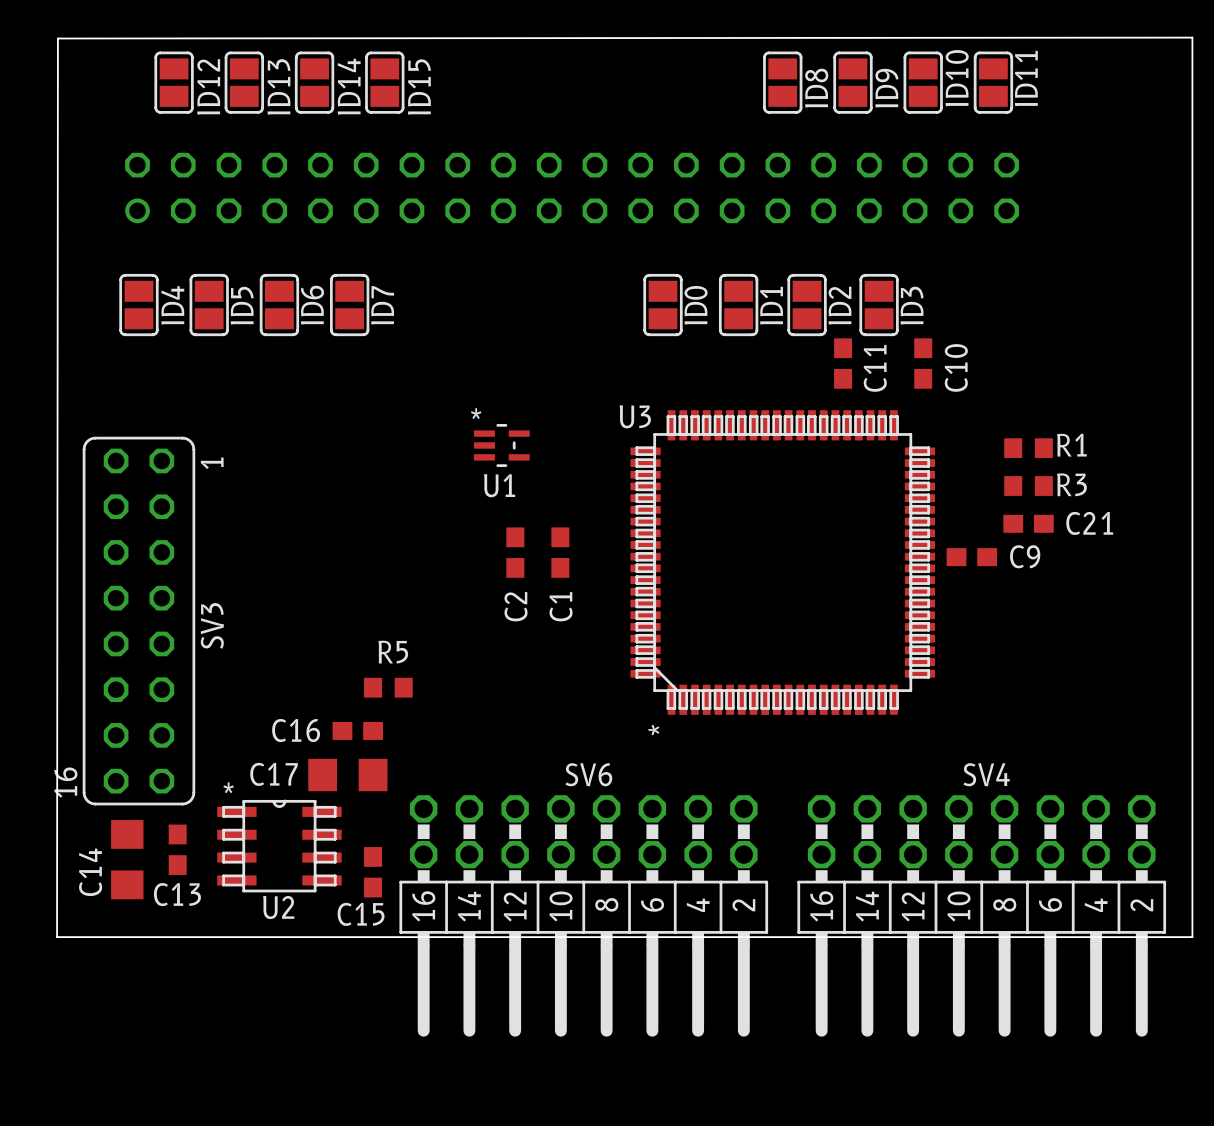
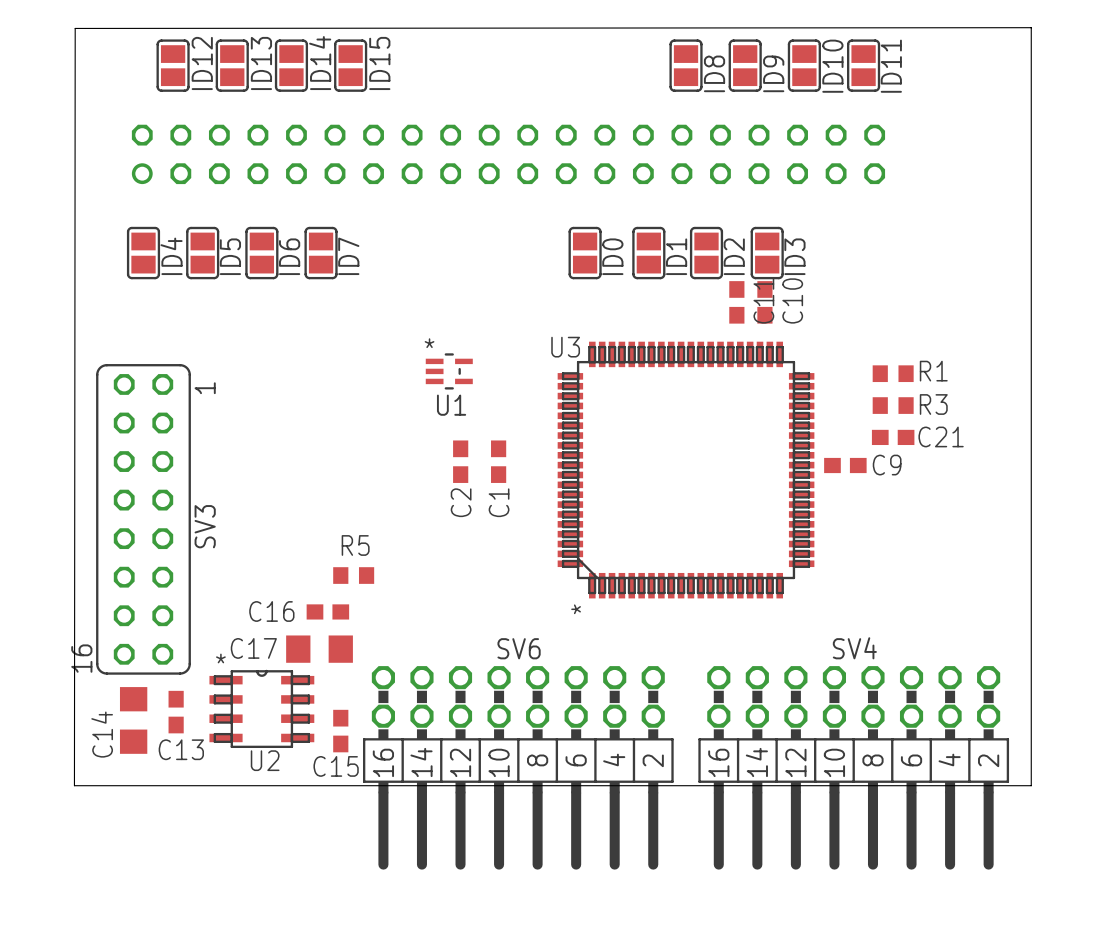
C10 position: (923, 363) -> (764, 302)

